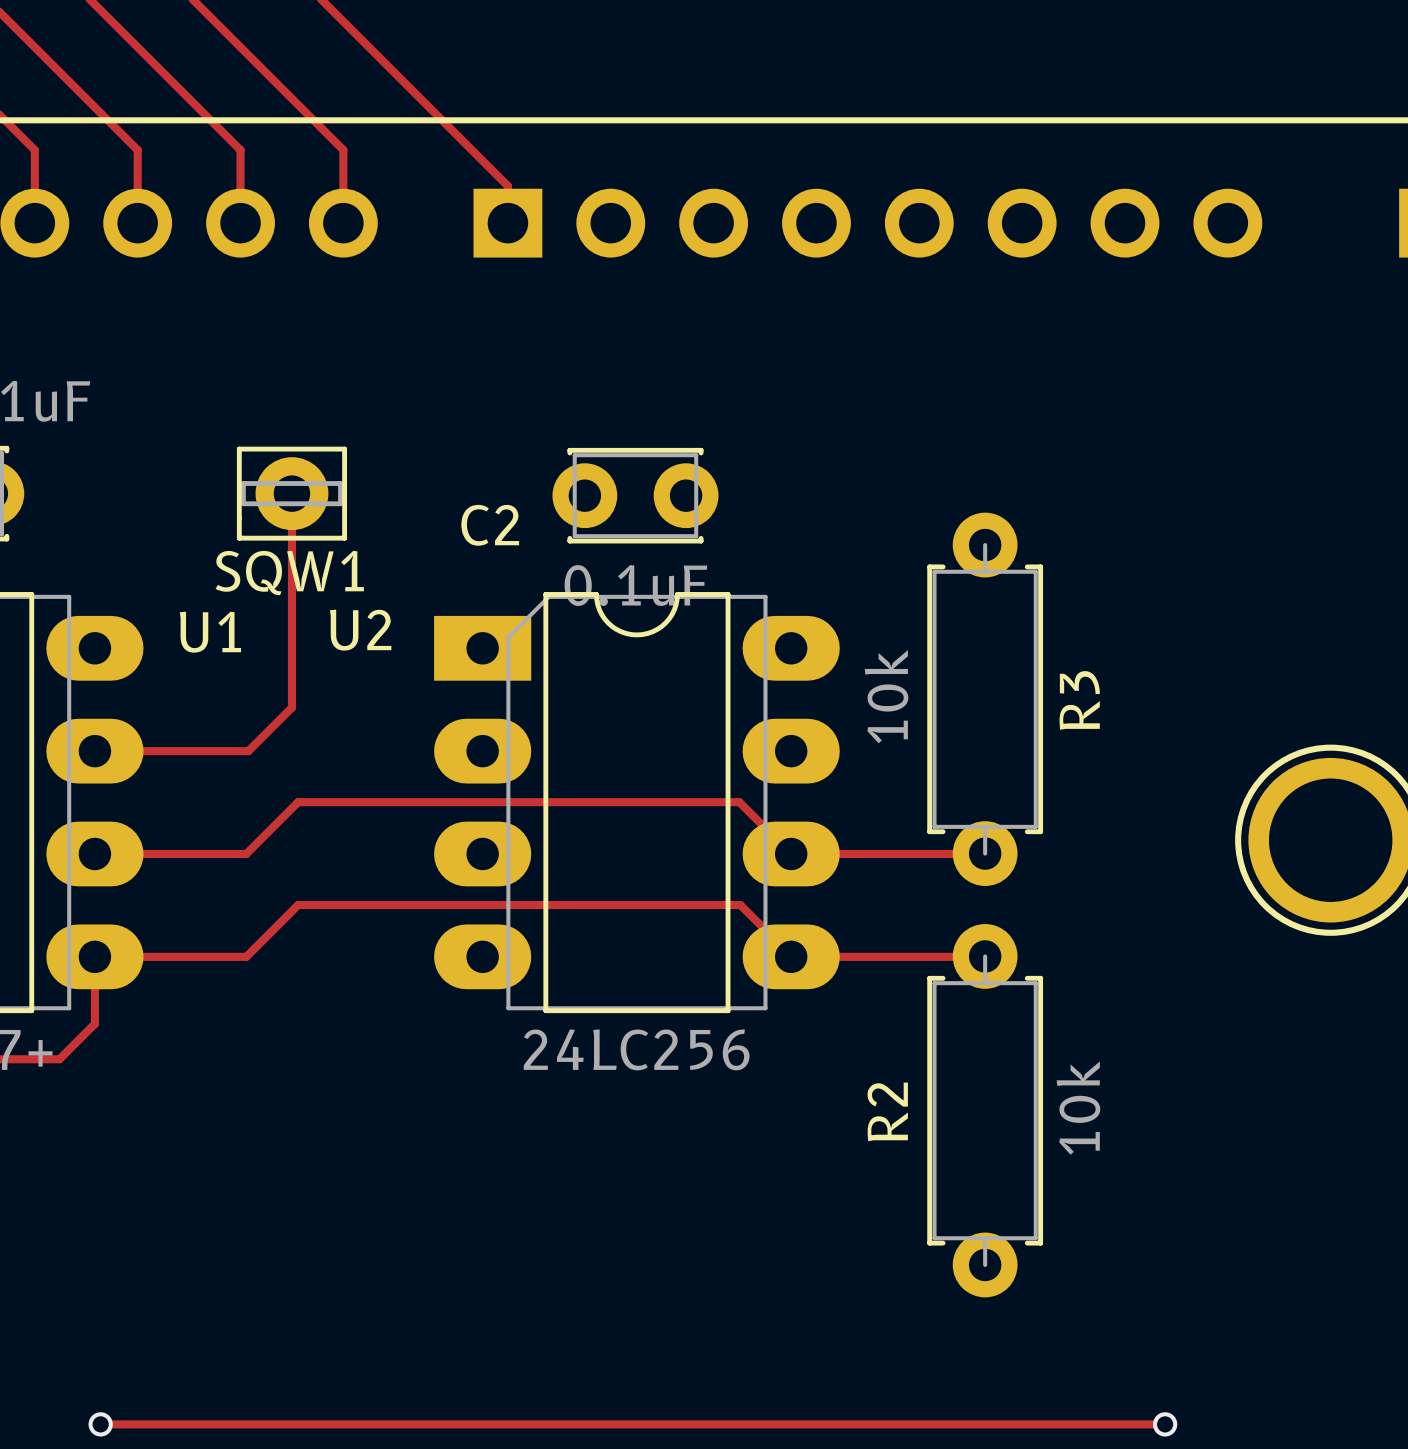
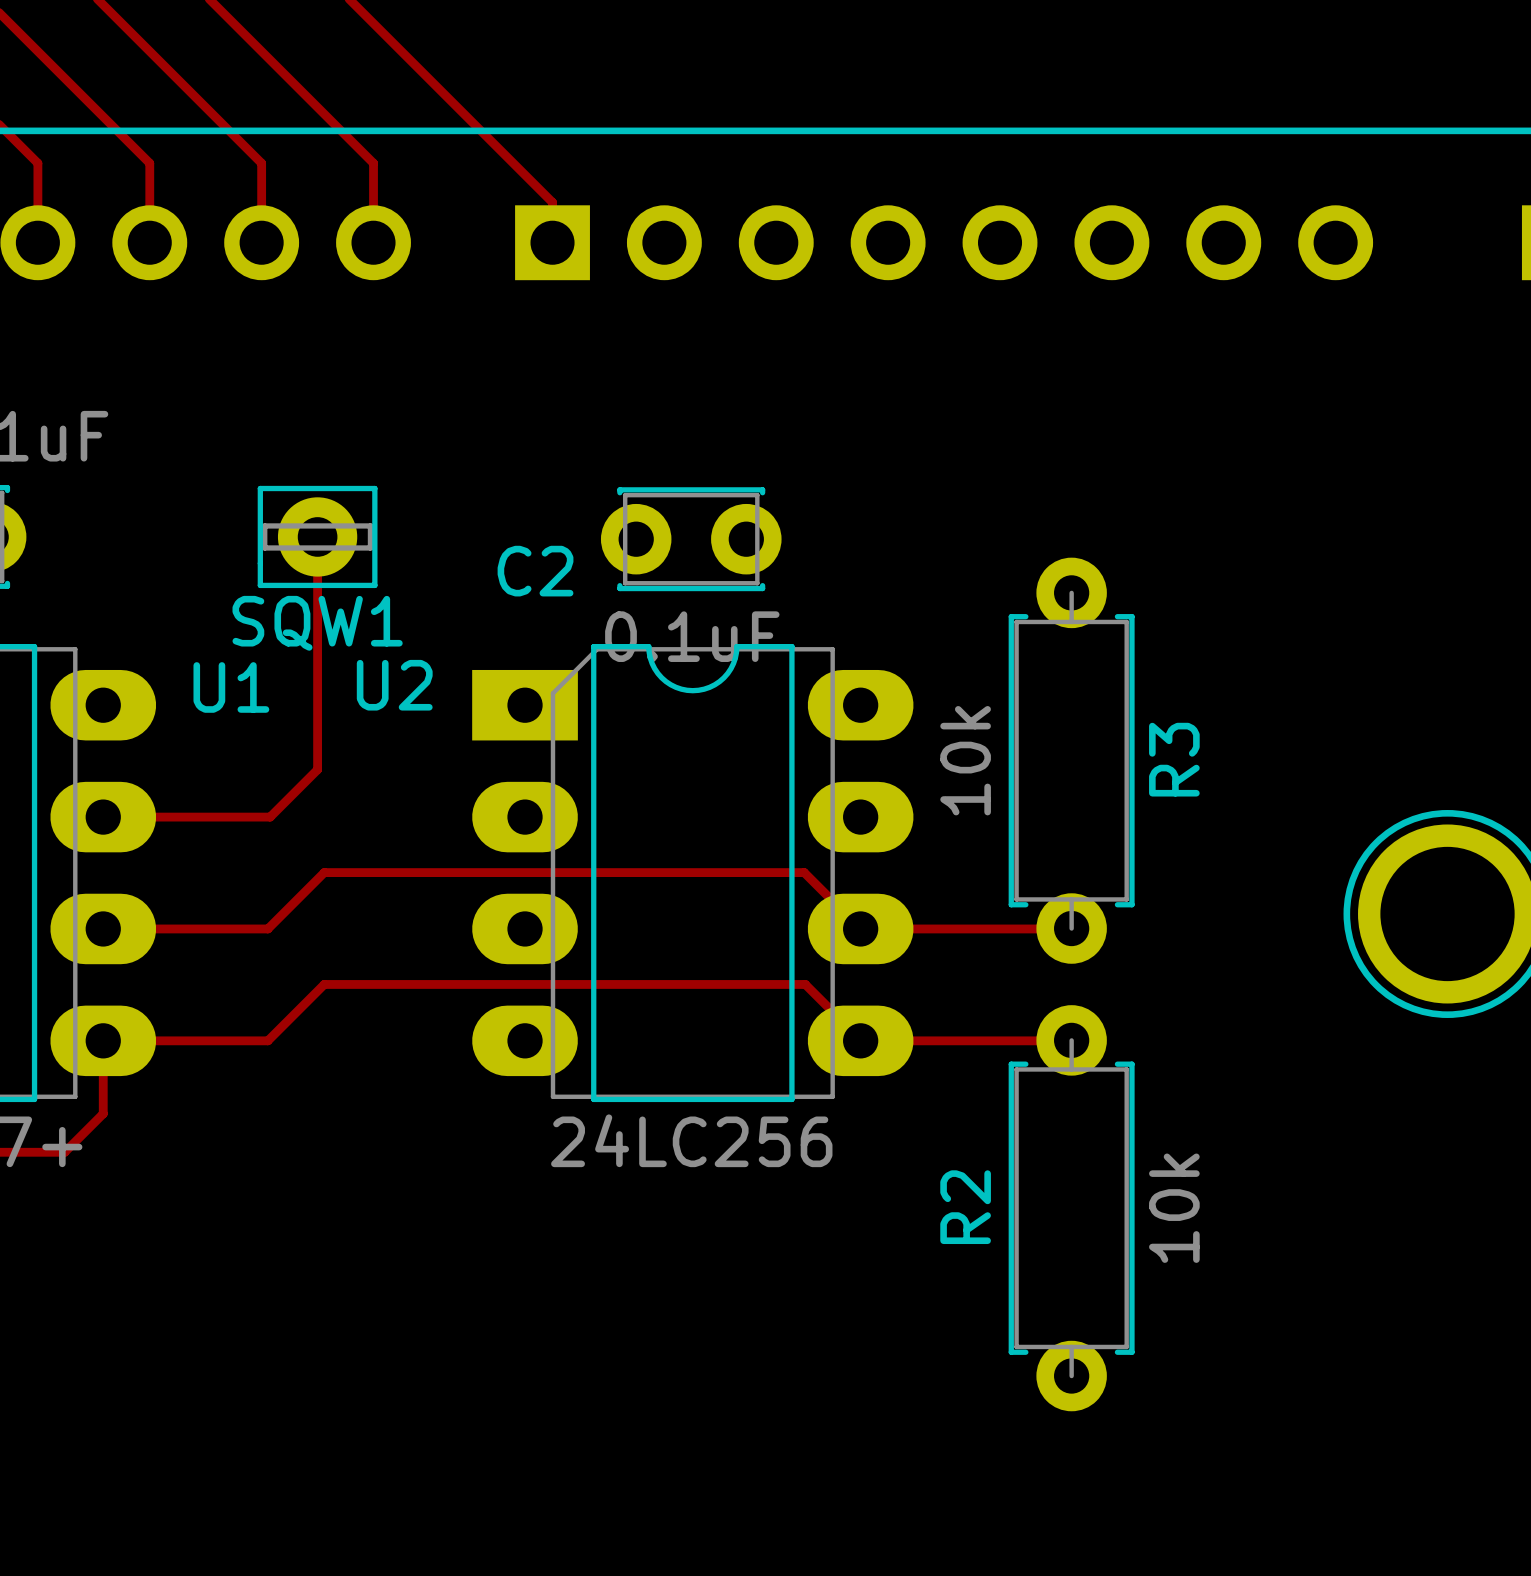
track: (100, 1424) (1165, 1424) -> none
via: (100, 1424) -> none
via: (1165, 1424) -> none

